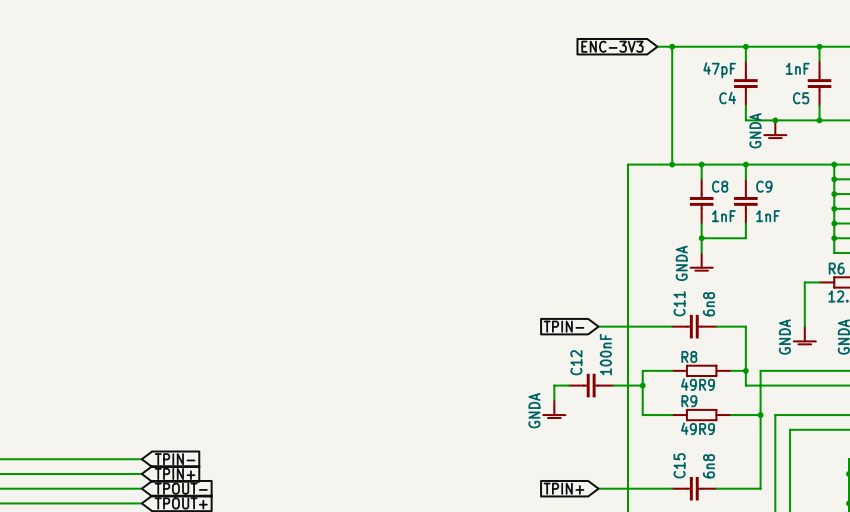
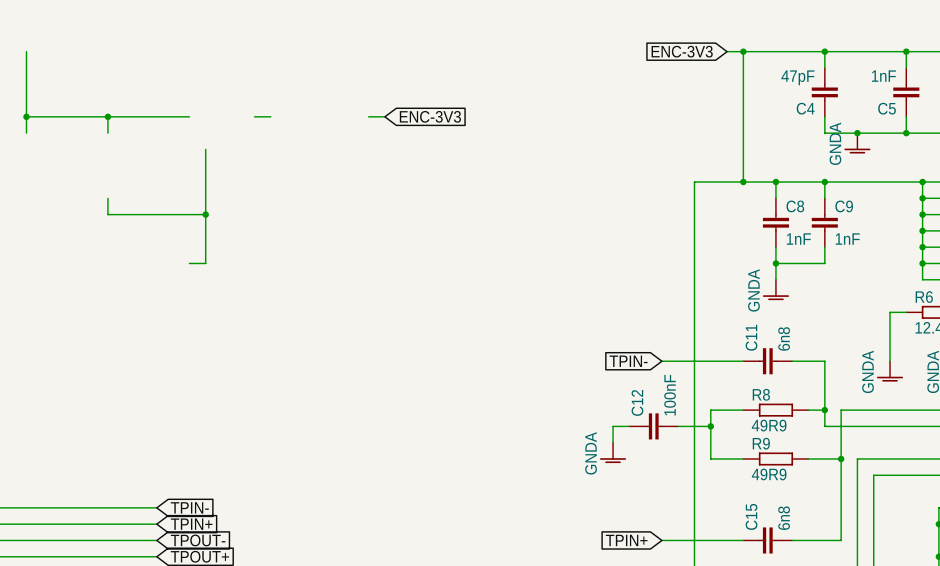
wire: none -> (26, 51) (26, 133)
wire: none -> (26, 116) (189, 116)
junction: none -> (26, 116)
wire: none -> (107, 116) (107, 133)
junction: none -> (107, 116)
wire: none -> (254, 116) (270, 116)
wire: none -> (368, 116) (384, 116)
global label: none -> ENC-3V3 (430, 116)
wire: none -> (205, 149) (205, 263) (189, 263)
wire: none -> (107, 198) (107, 214) (205, 214)
junction: none -> (205, 214)

